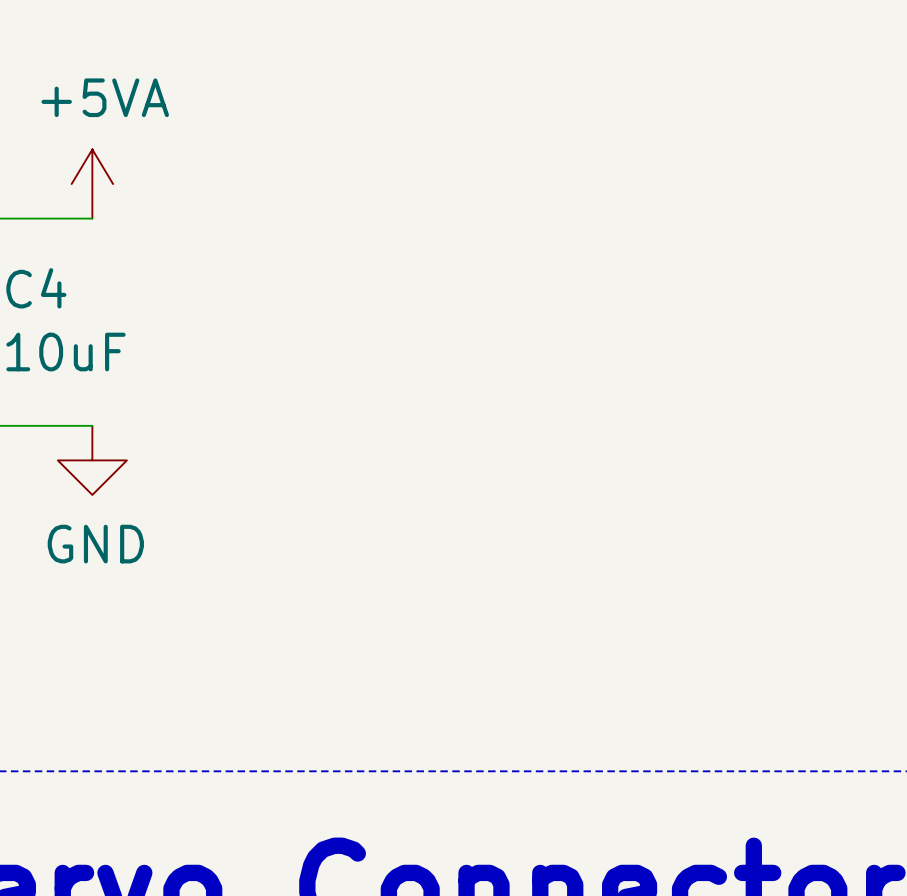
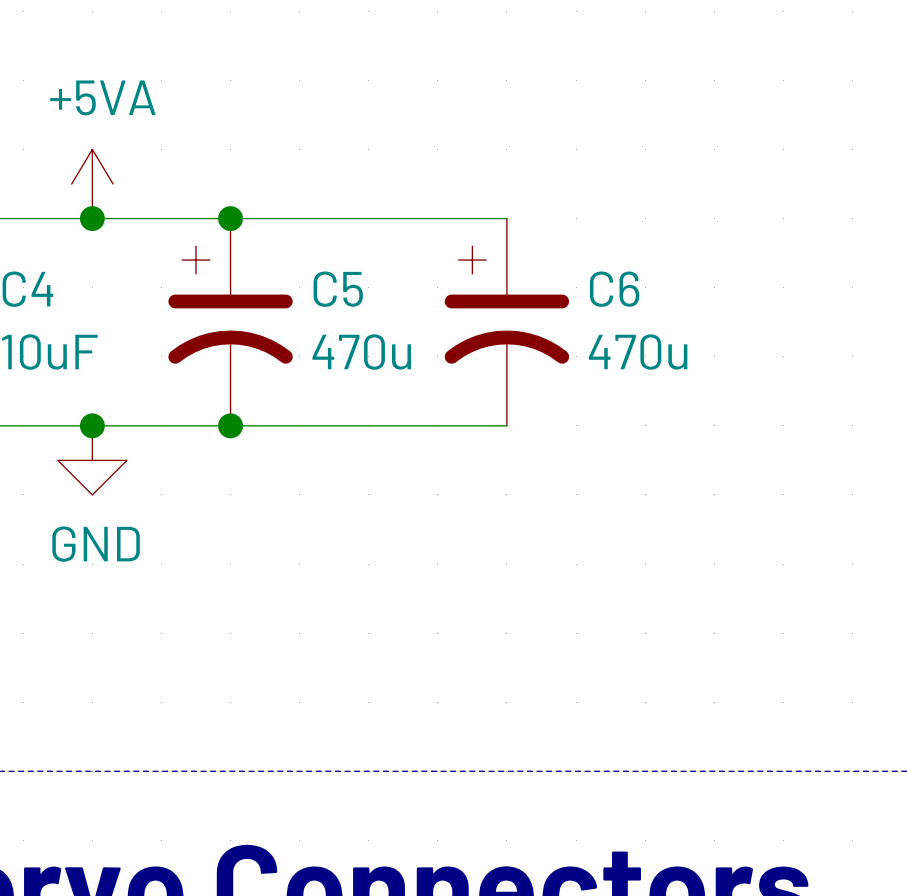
wire: none -> (92, 218) (506, 218)
junction: none -> (92, 218)
junction: none -> (230, 218)
C5: none -> 470u (230, 322)
C6: none -> 470u (506, 322)
wire: none -> (92, 425) (506, 425)
junction: none -> (92, 425)
junction: none -> (230, 425)

